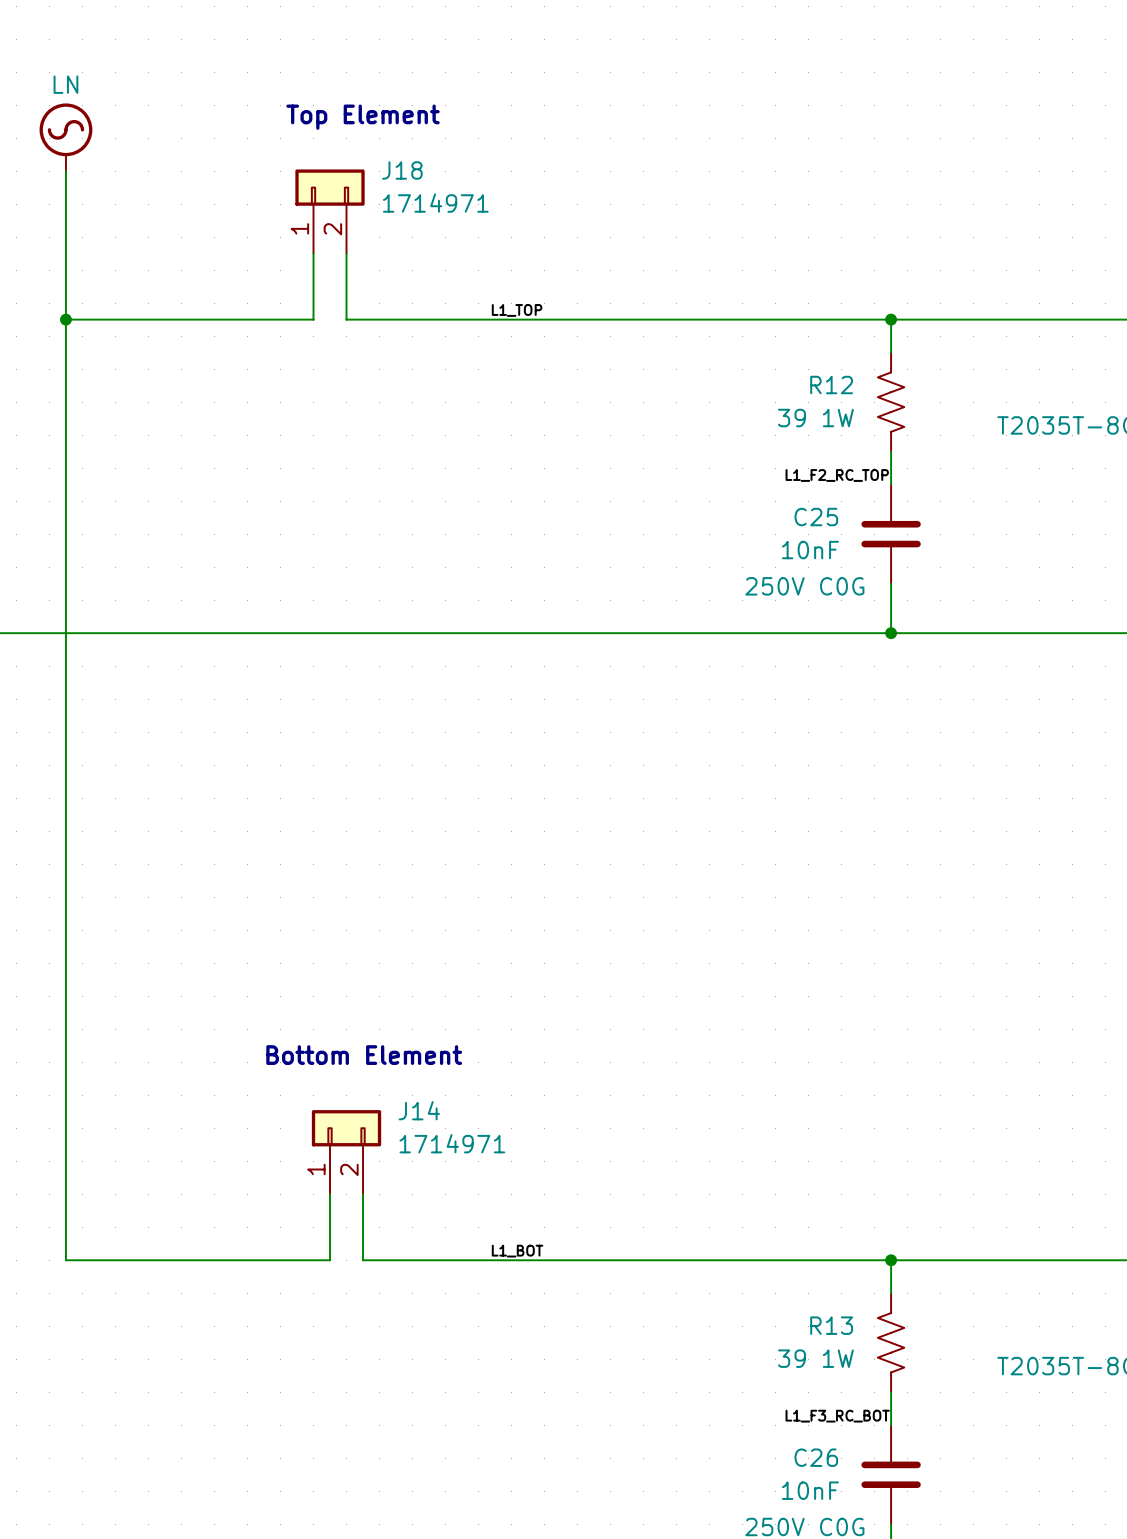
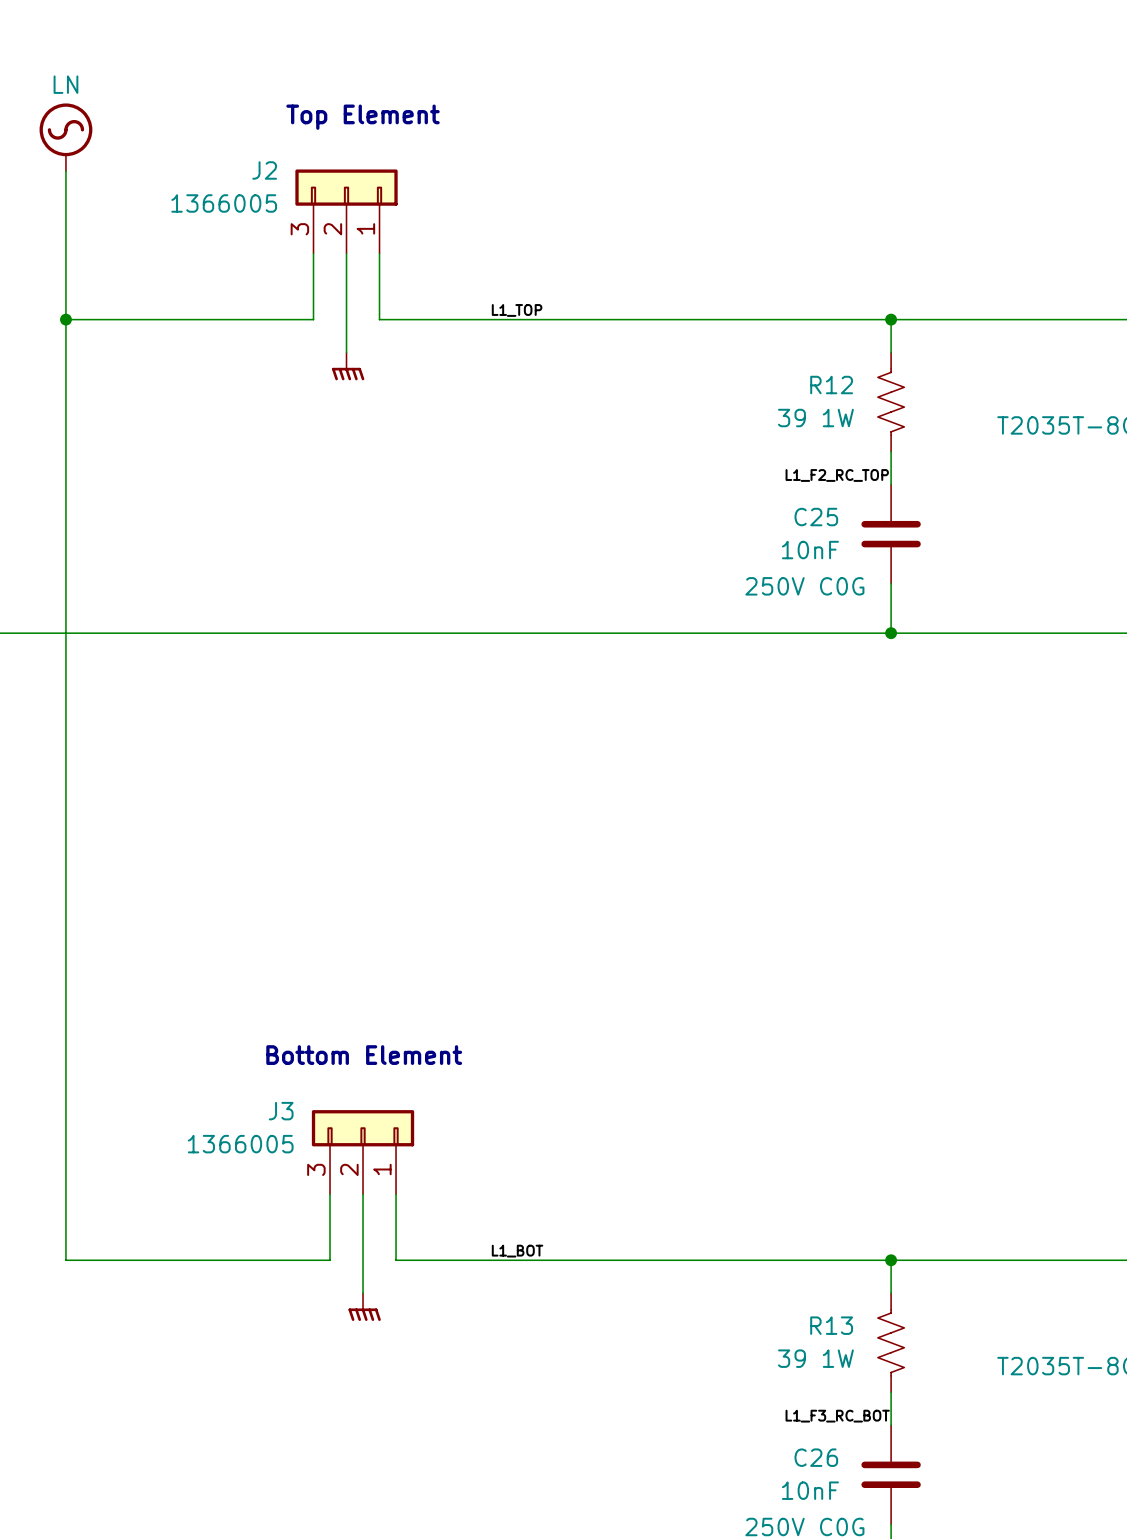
J18: 1714971 (330, 211) -> none
J2: none -> 1366005 (346, 211)
wire: none -> (379, 253) (379, 319)
wire: (346, 319) (379, 319) -> (346, 319) (346, 352)
power symbol: none -> (348, 366)
J14: 1714971 (346, 1152) -> none
J3: none -> 1366005 (363, 1152)
wire: none -> (396, 1194) (396, 1260)
wire: (363, 1260) (396, 1260) -> (363, 1260) (363, 1293)
power symbol: none -> (364, 1307)

